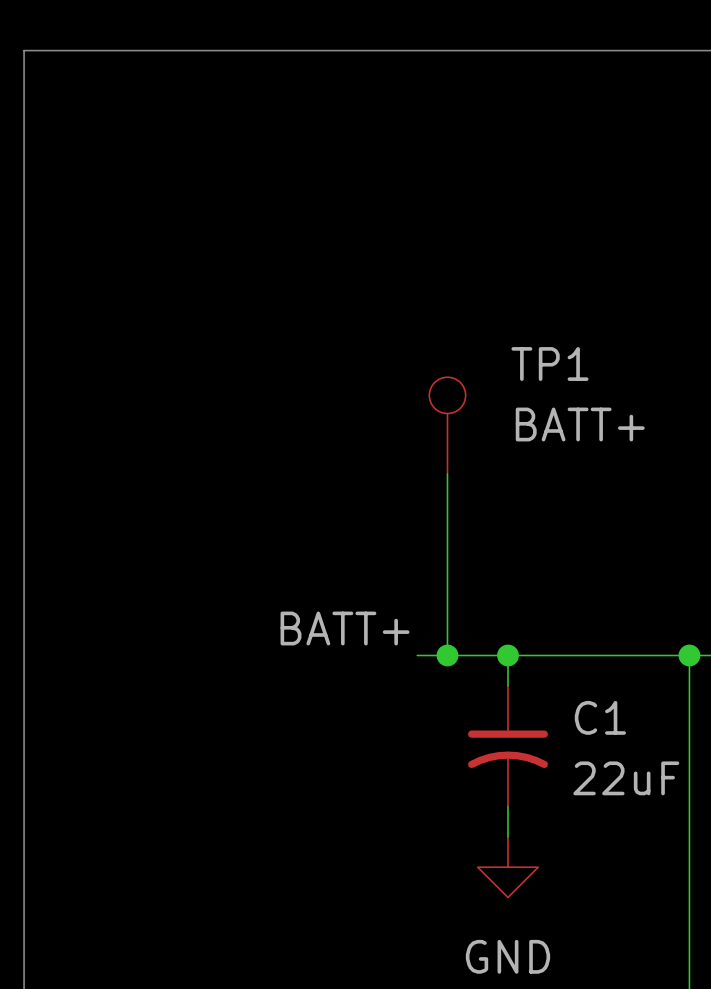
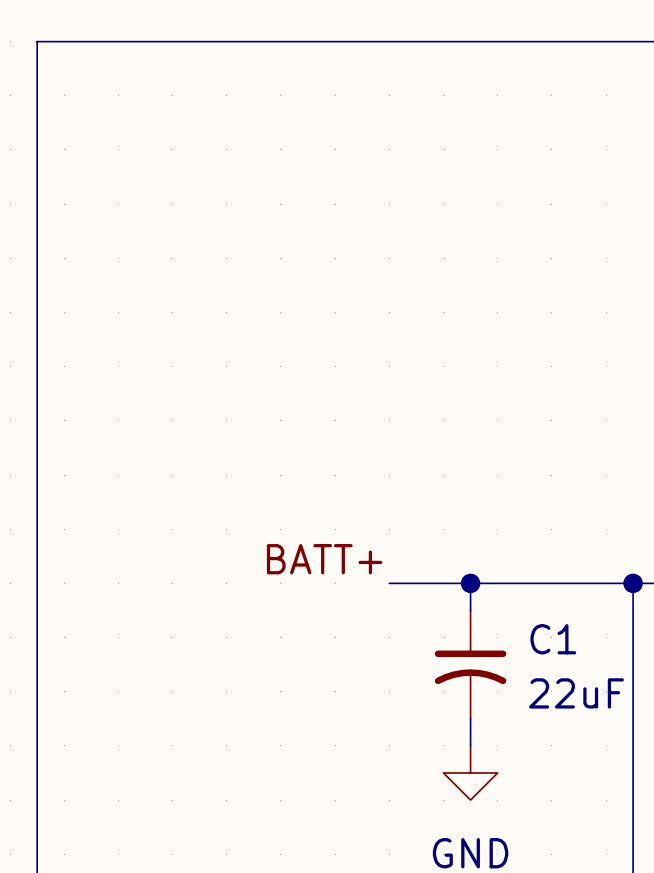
TP1: BATT+ (447, 425) -> none
wire: (447, 474) (447, 655) -> none
junction: (447, 655) -> none

